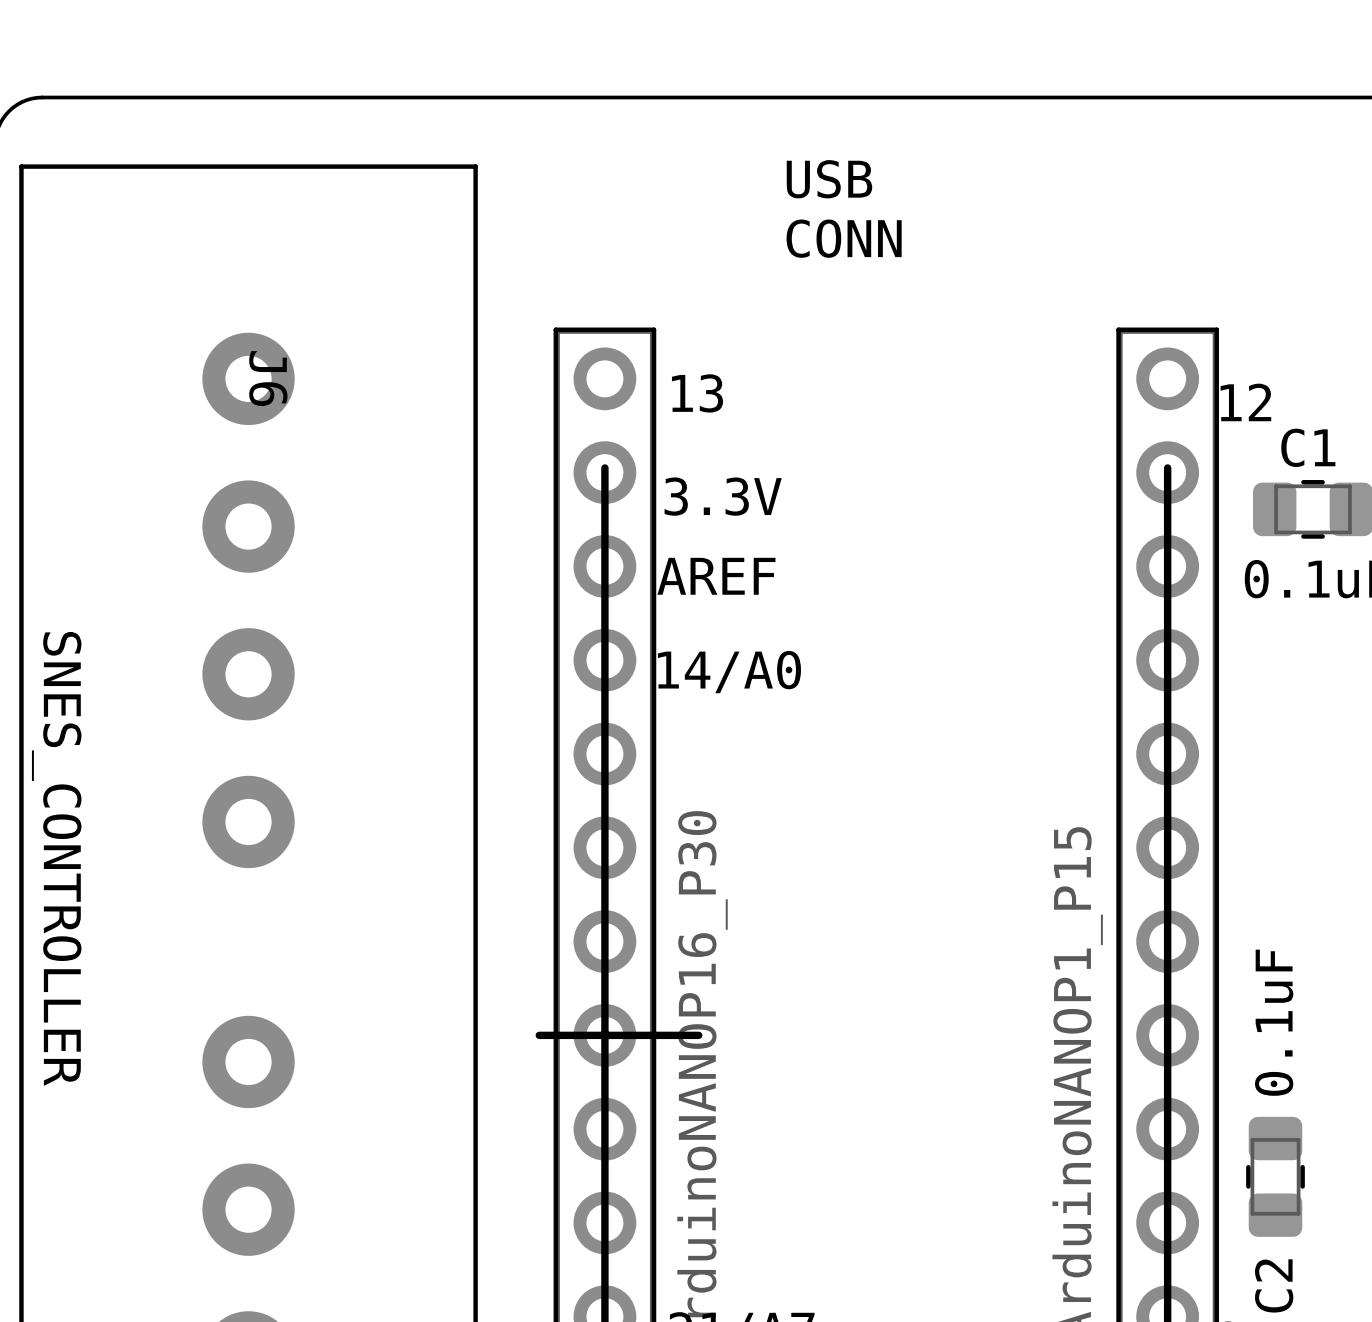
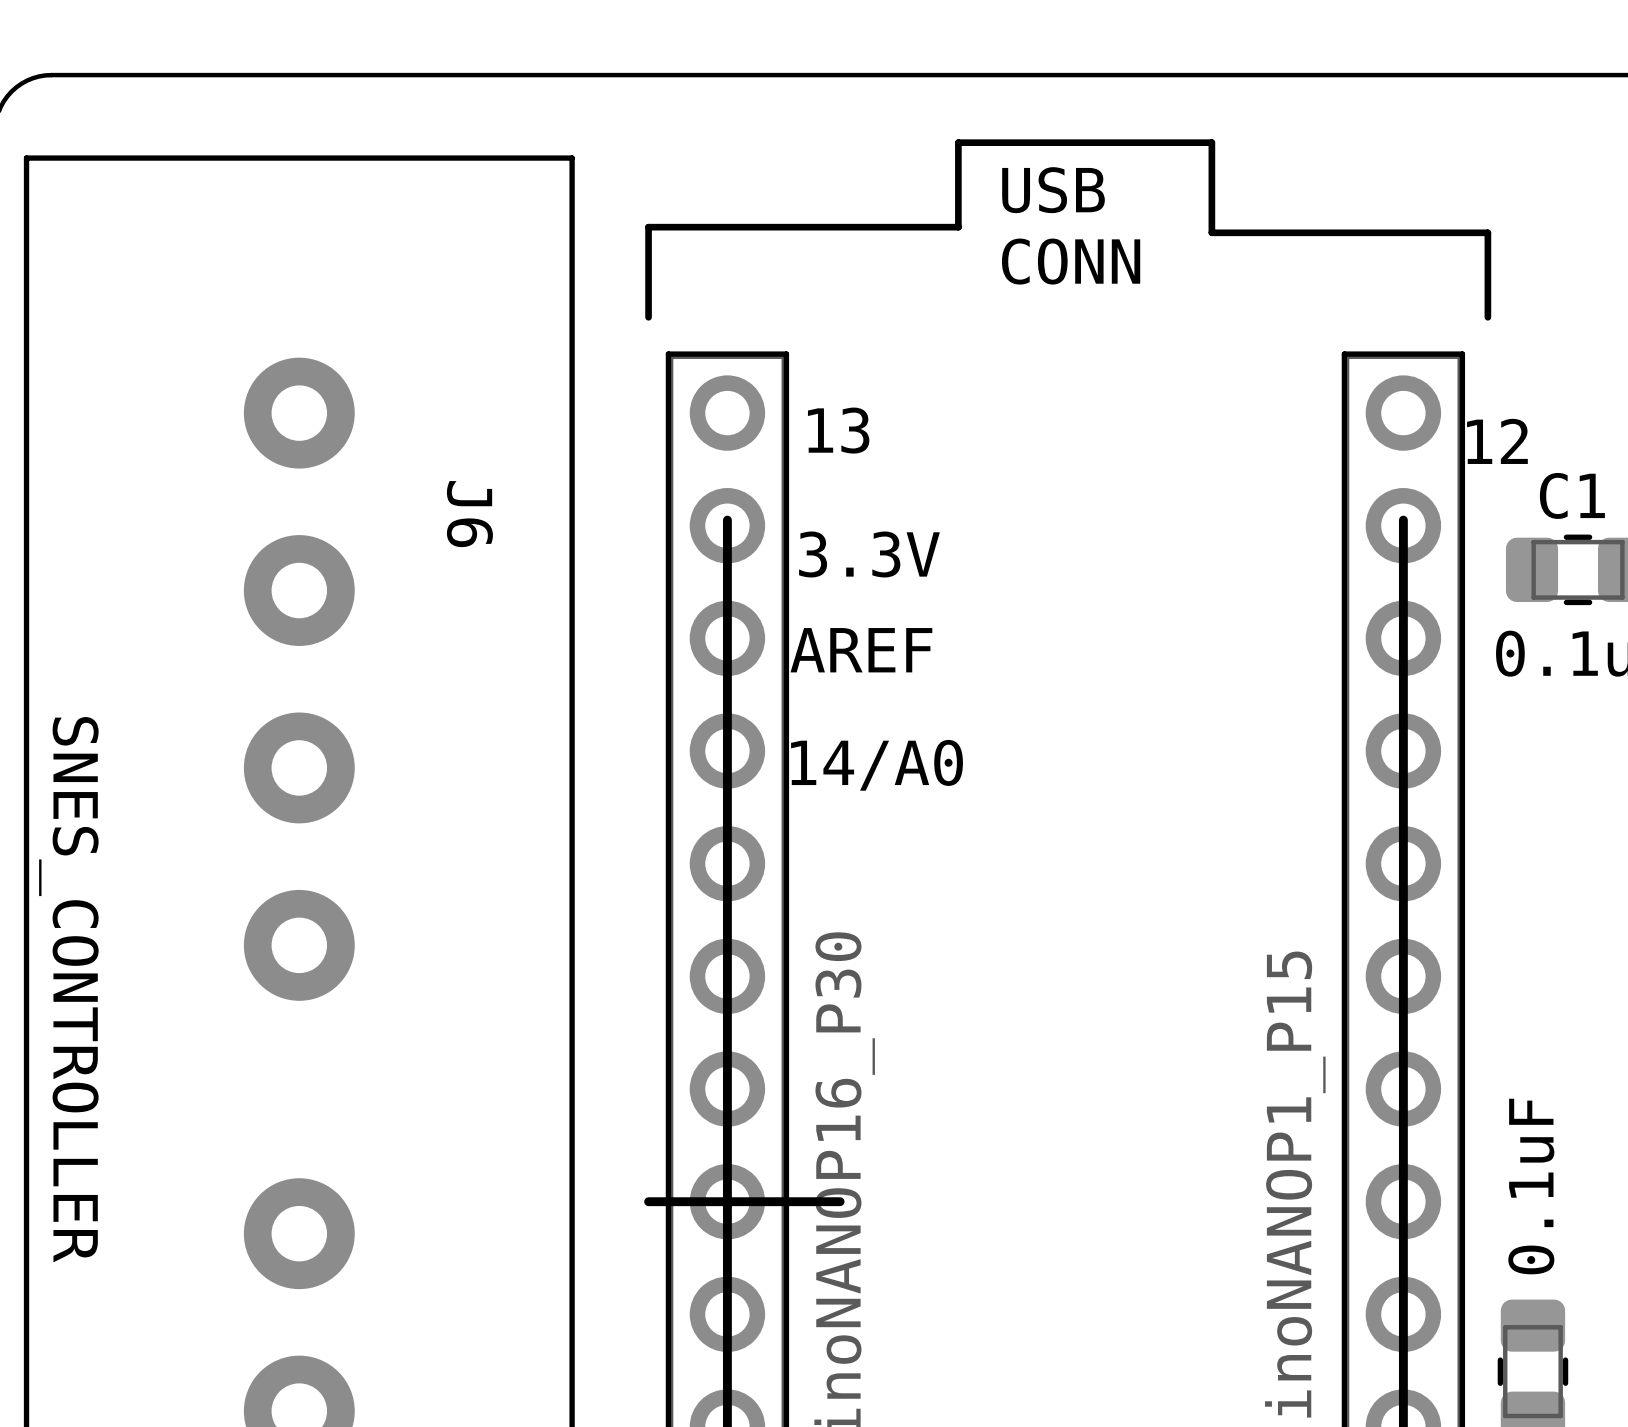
text position: USB (829, 179) -> USB (1053, 190)
text position: CONN (844, 238) -> CONN (1071, 261)
line: none -> (648, 317) (648, 227) (958, 227) (958, 142) (1211, 142) (1211, 232) (1487, 232) (1487, 317)
J6 name position: J6 (268, 378) -> J6 (469, 514)

